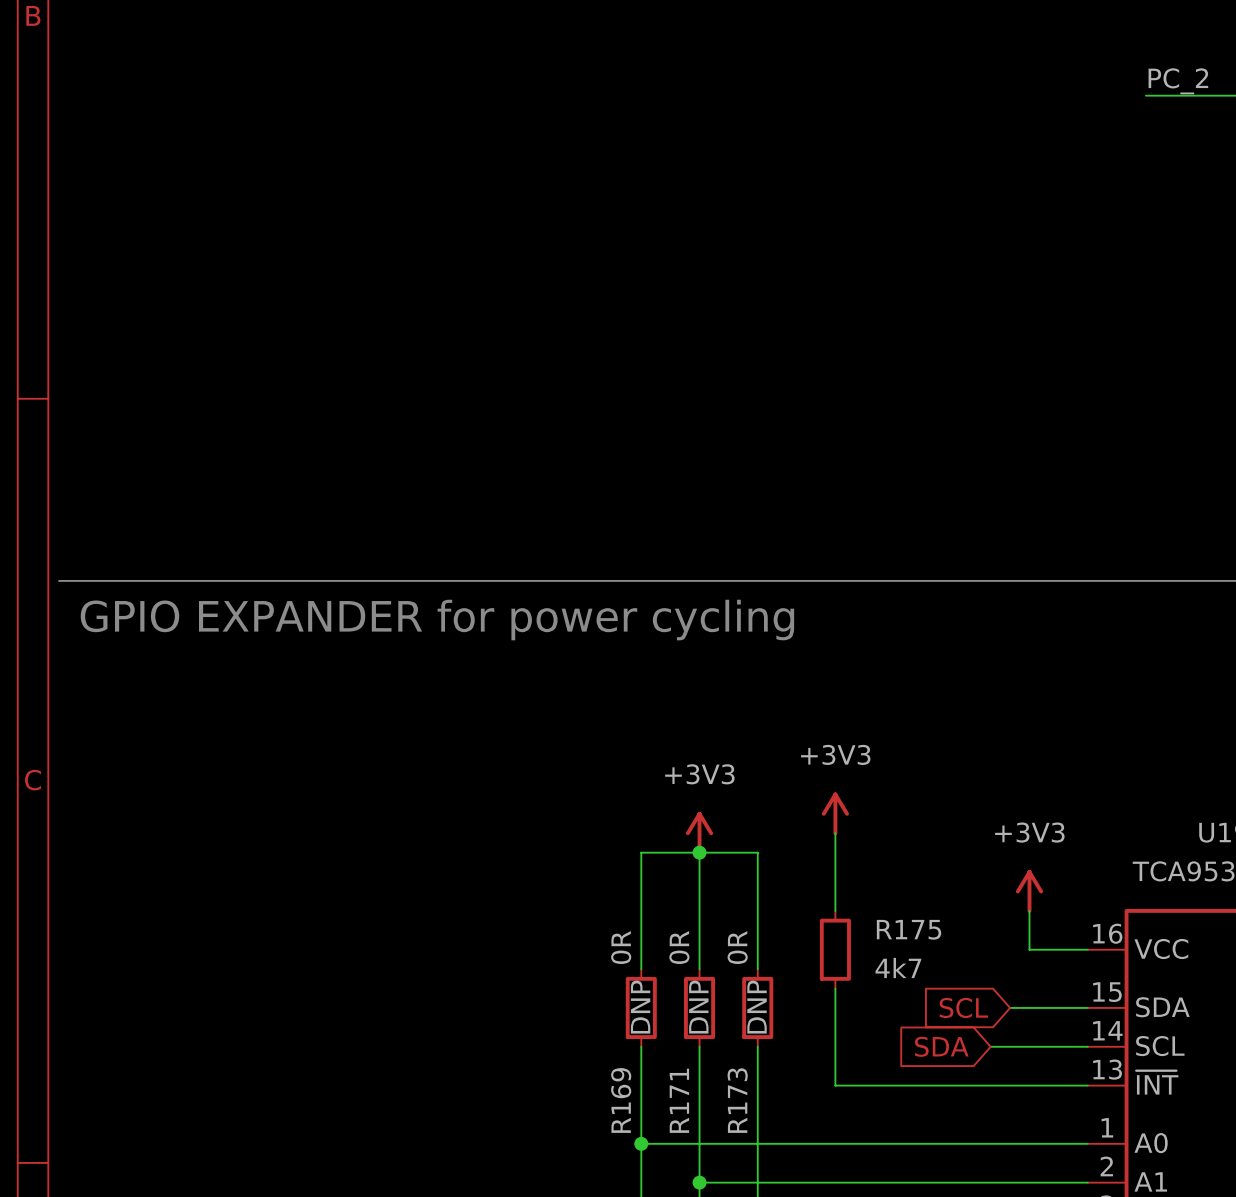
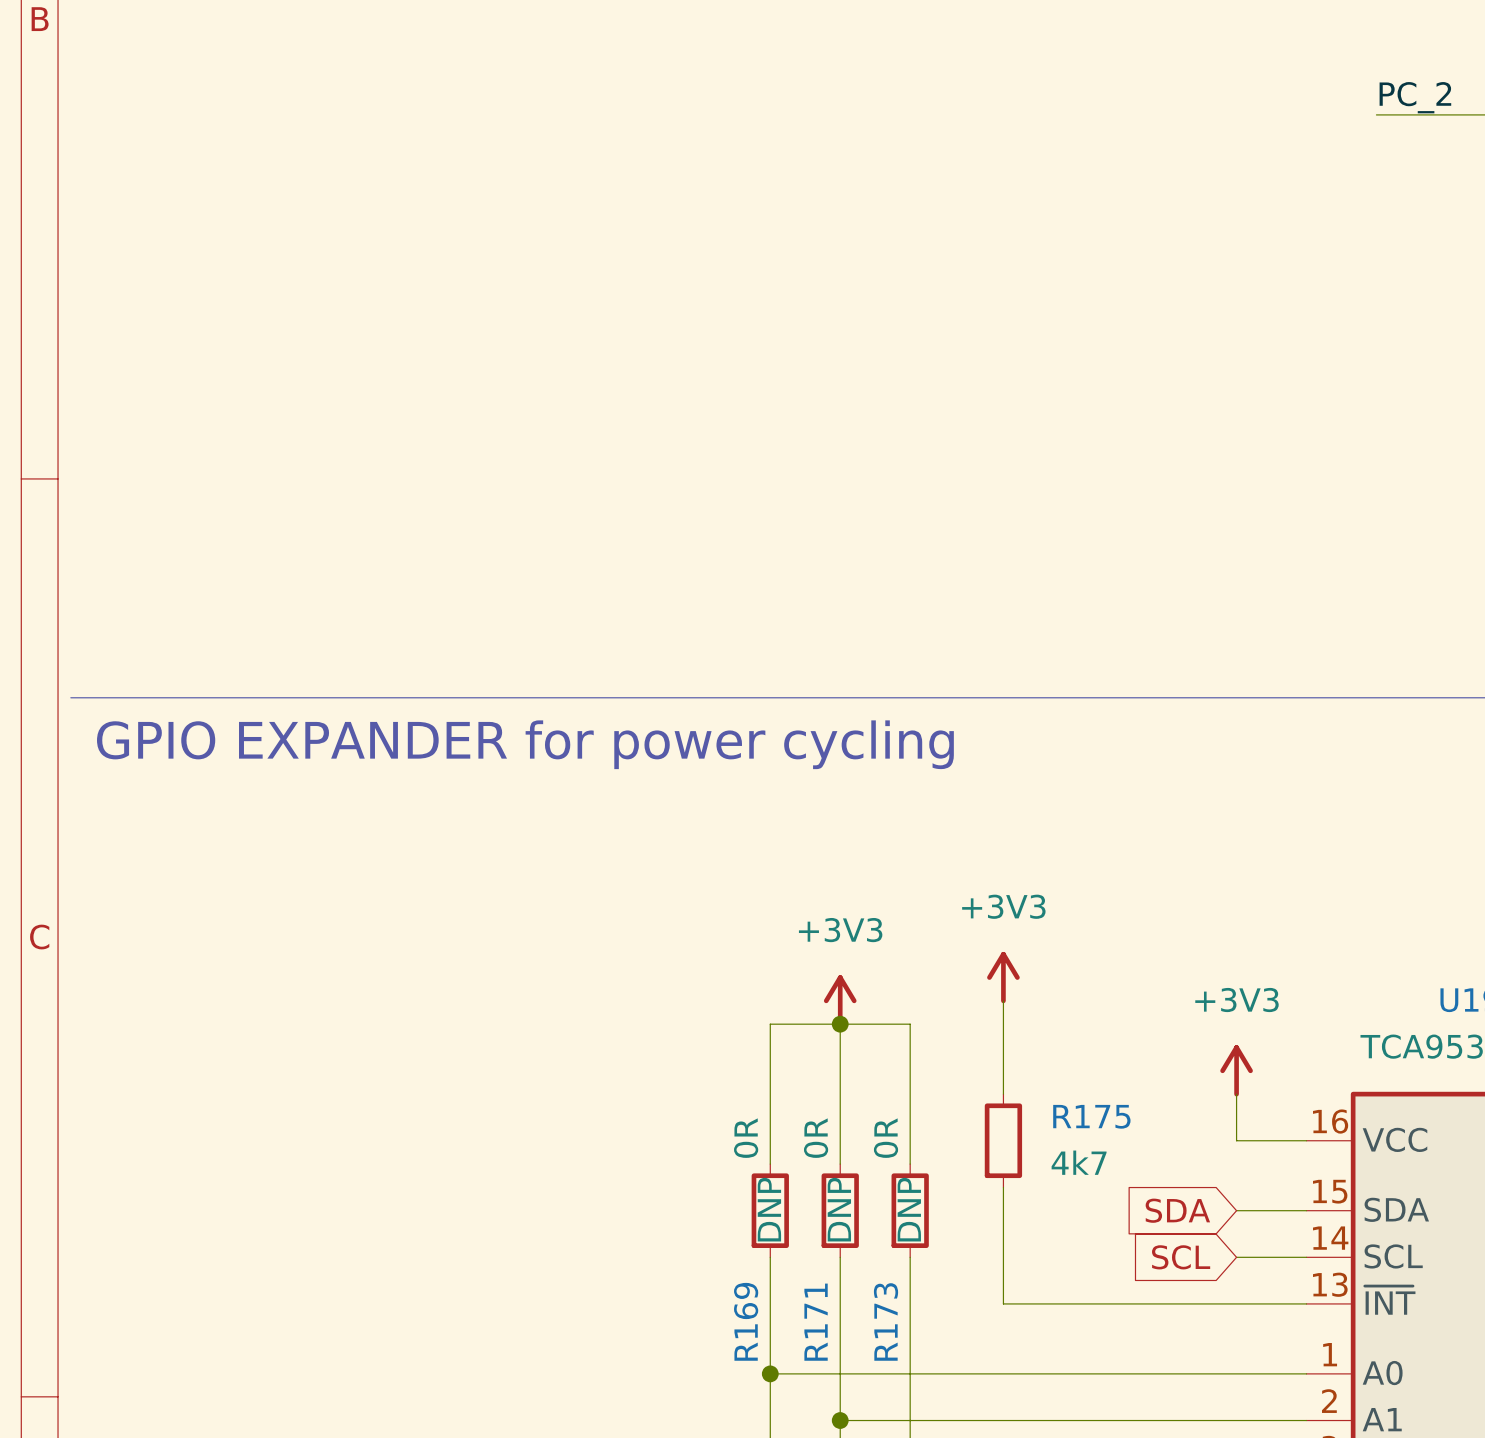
global label position: SCL (963, 1007) -> SCL (1181, 1257)
wire: (1010, 1007) (1029, 1007) -> none
global label position: SDA (941, 1046) -> SDA (1177, 1210)
wire: (990, 1046) (1029, 1046) -> none

